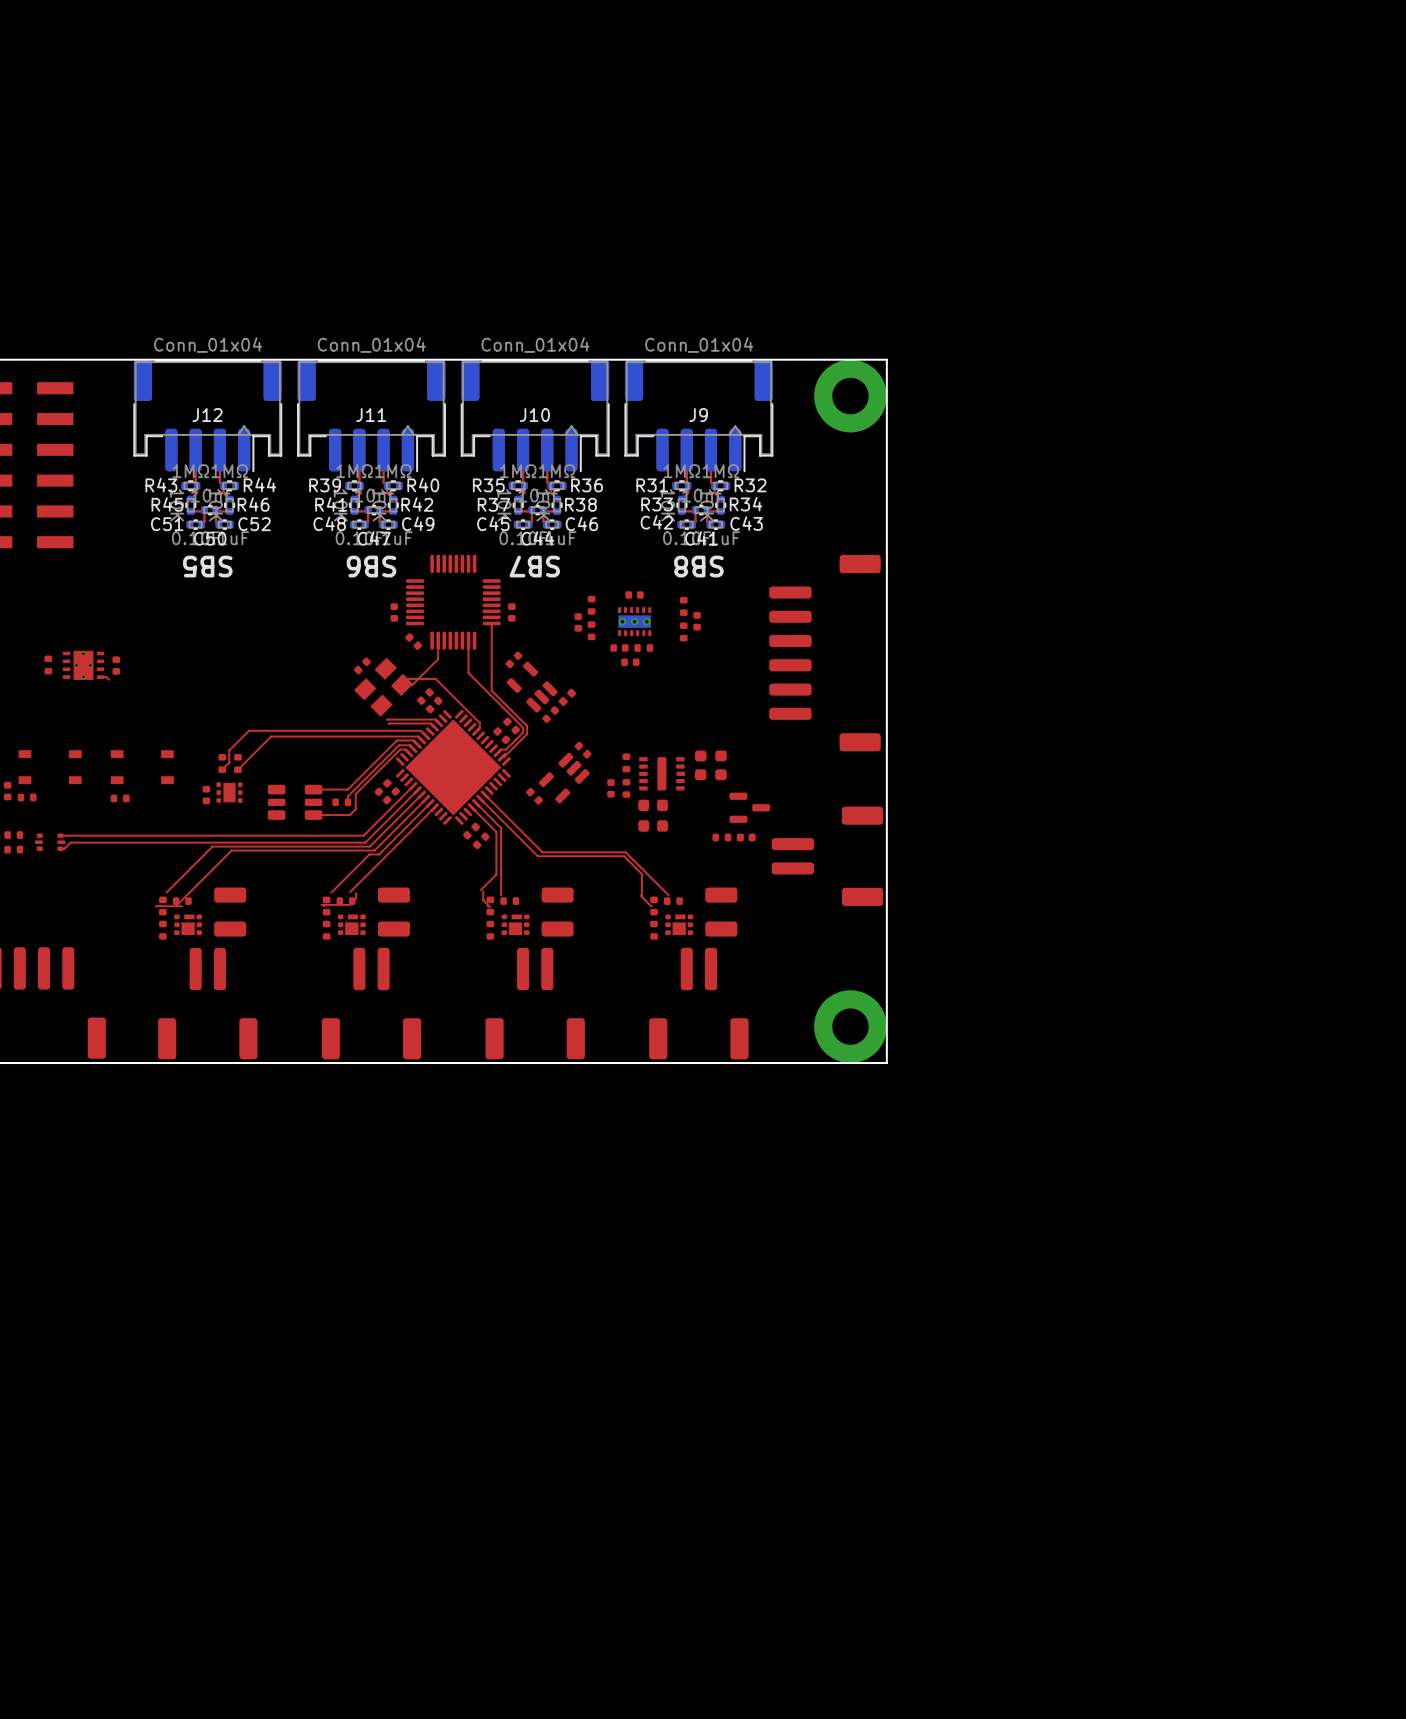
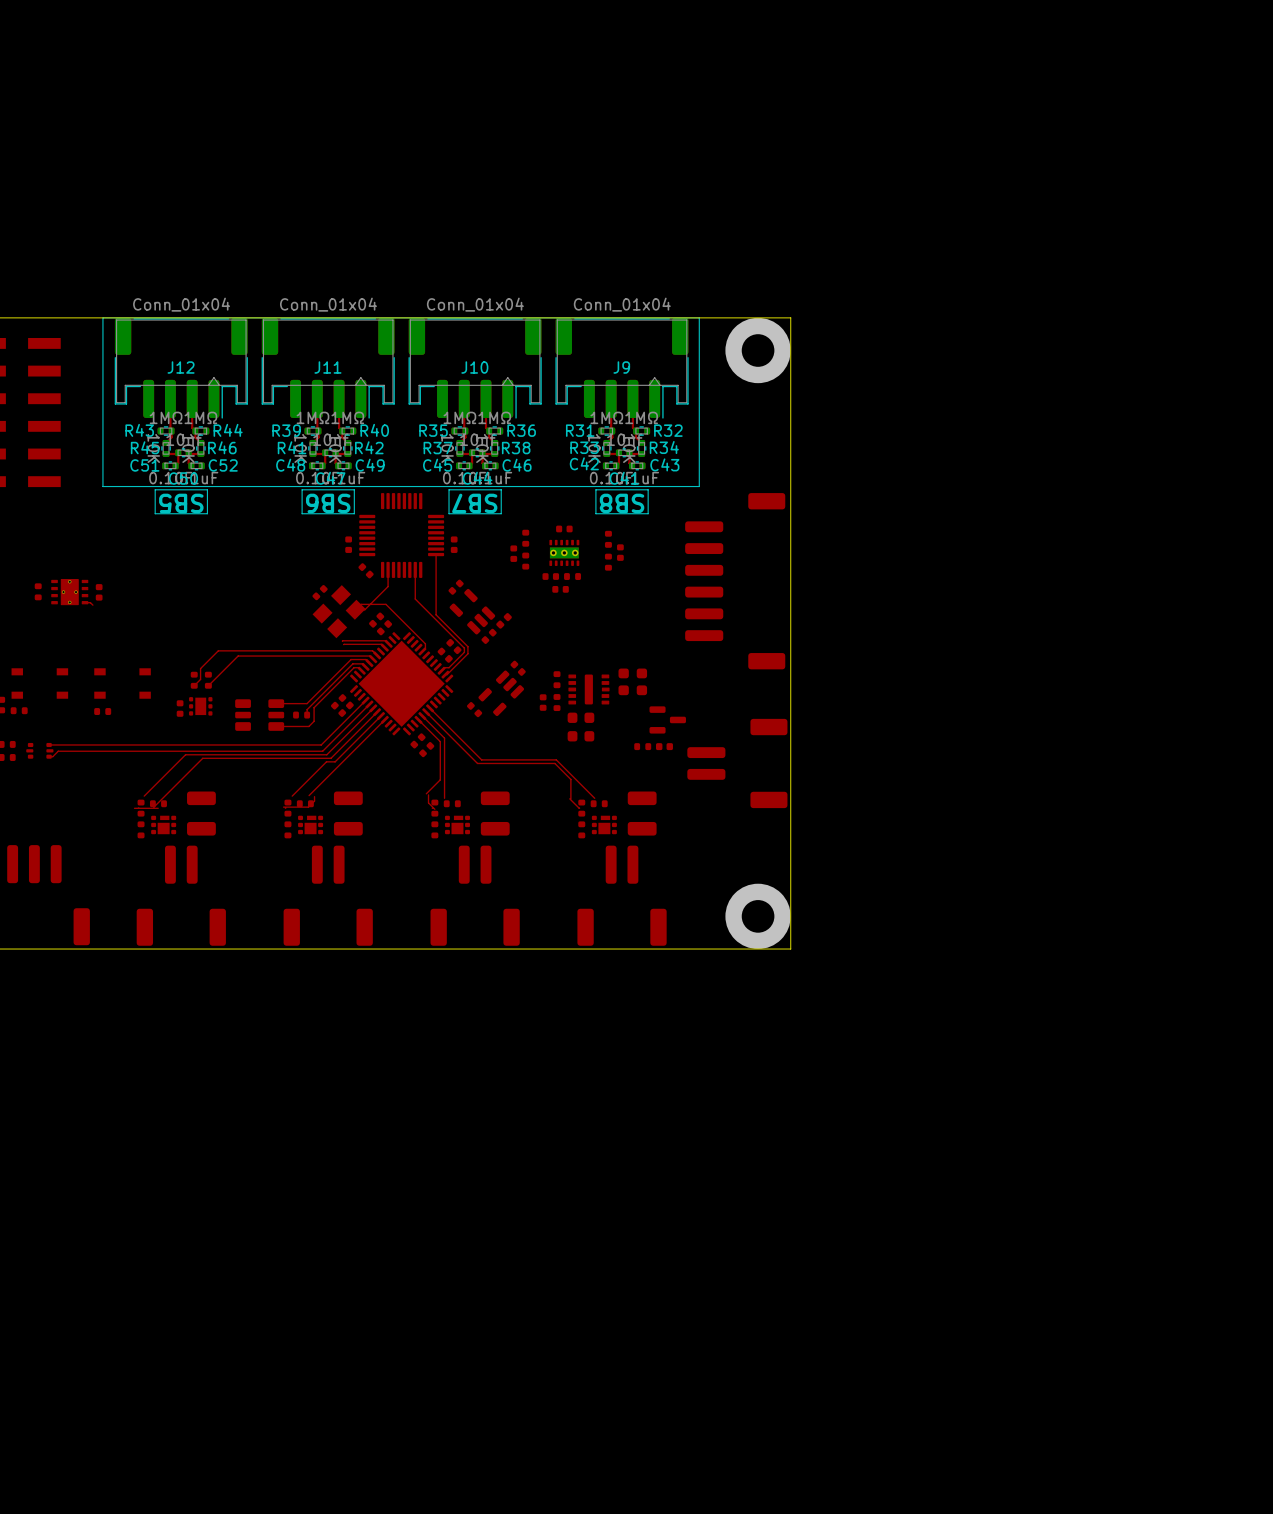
line: none -> (699, 317) (102, 317) (102, 486) (699, 486) (699, 317)
line: none -> (207, 489) (155, 489) (155, 513) (207, 513) (207, 489)
line: none -> (354, 489) (302, 489) (302, 513) (354, 513) (354, 489)
line: none -> (501, 489) (449, 489) (449, 513) (501, 513) (501, 489)
line: none -> (648, 489) (595, 489) (595, 513) (648, 513) (648, 489)

